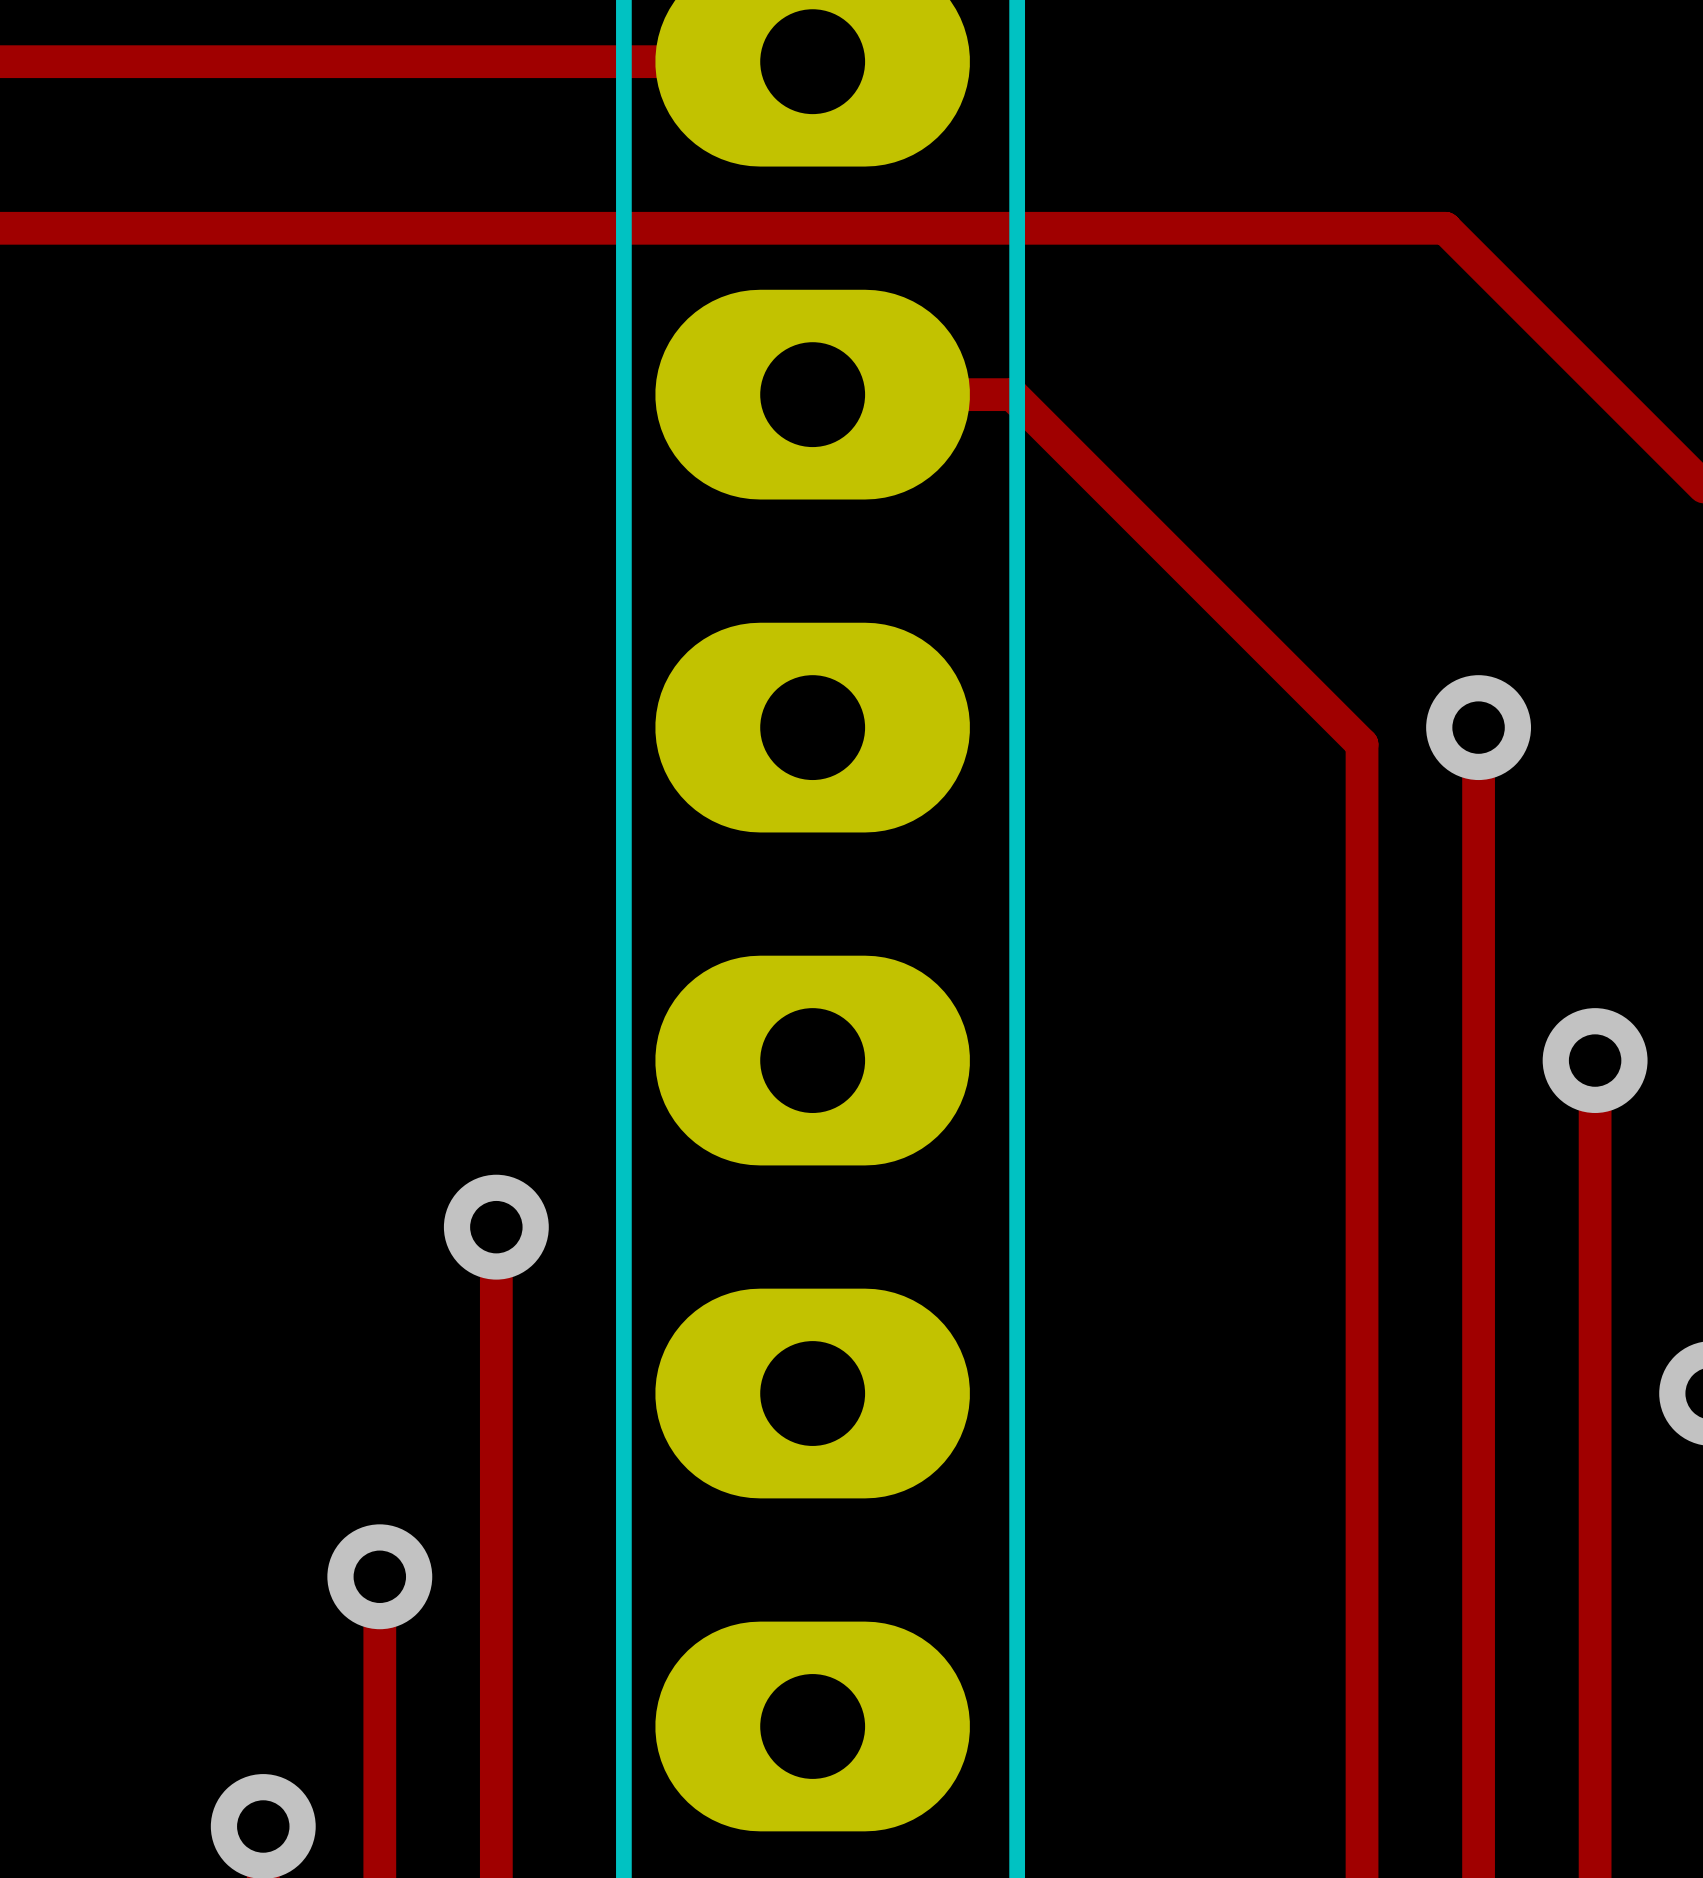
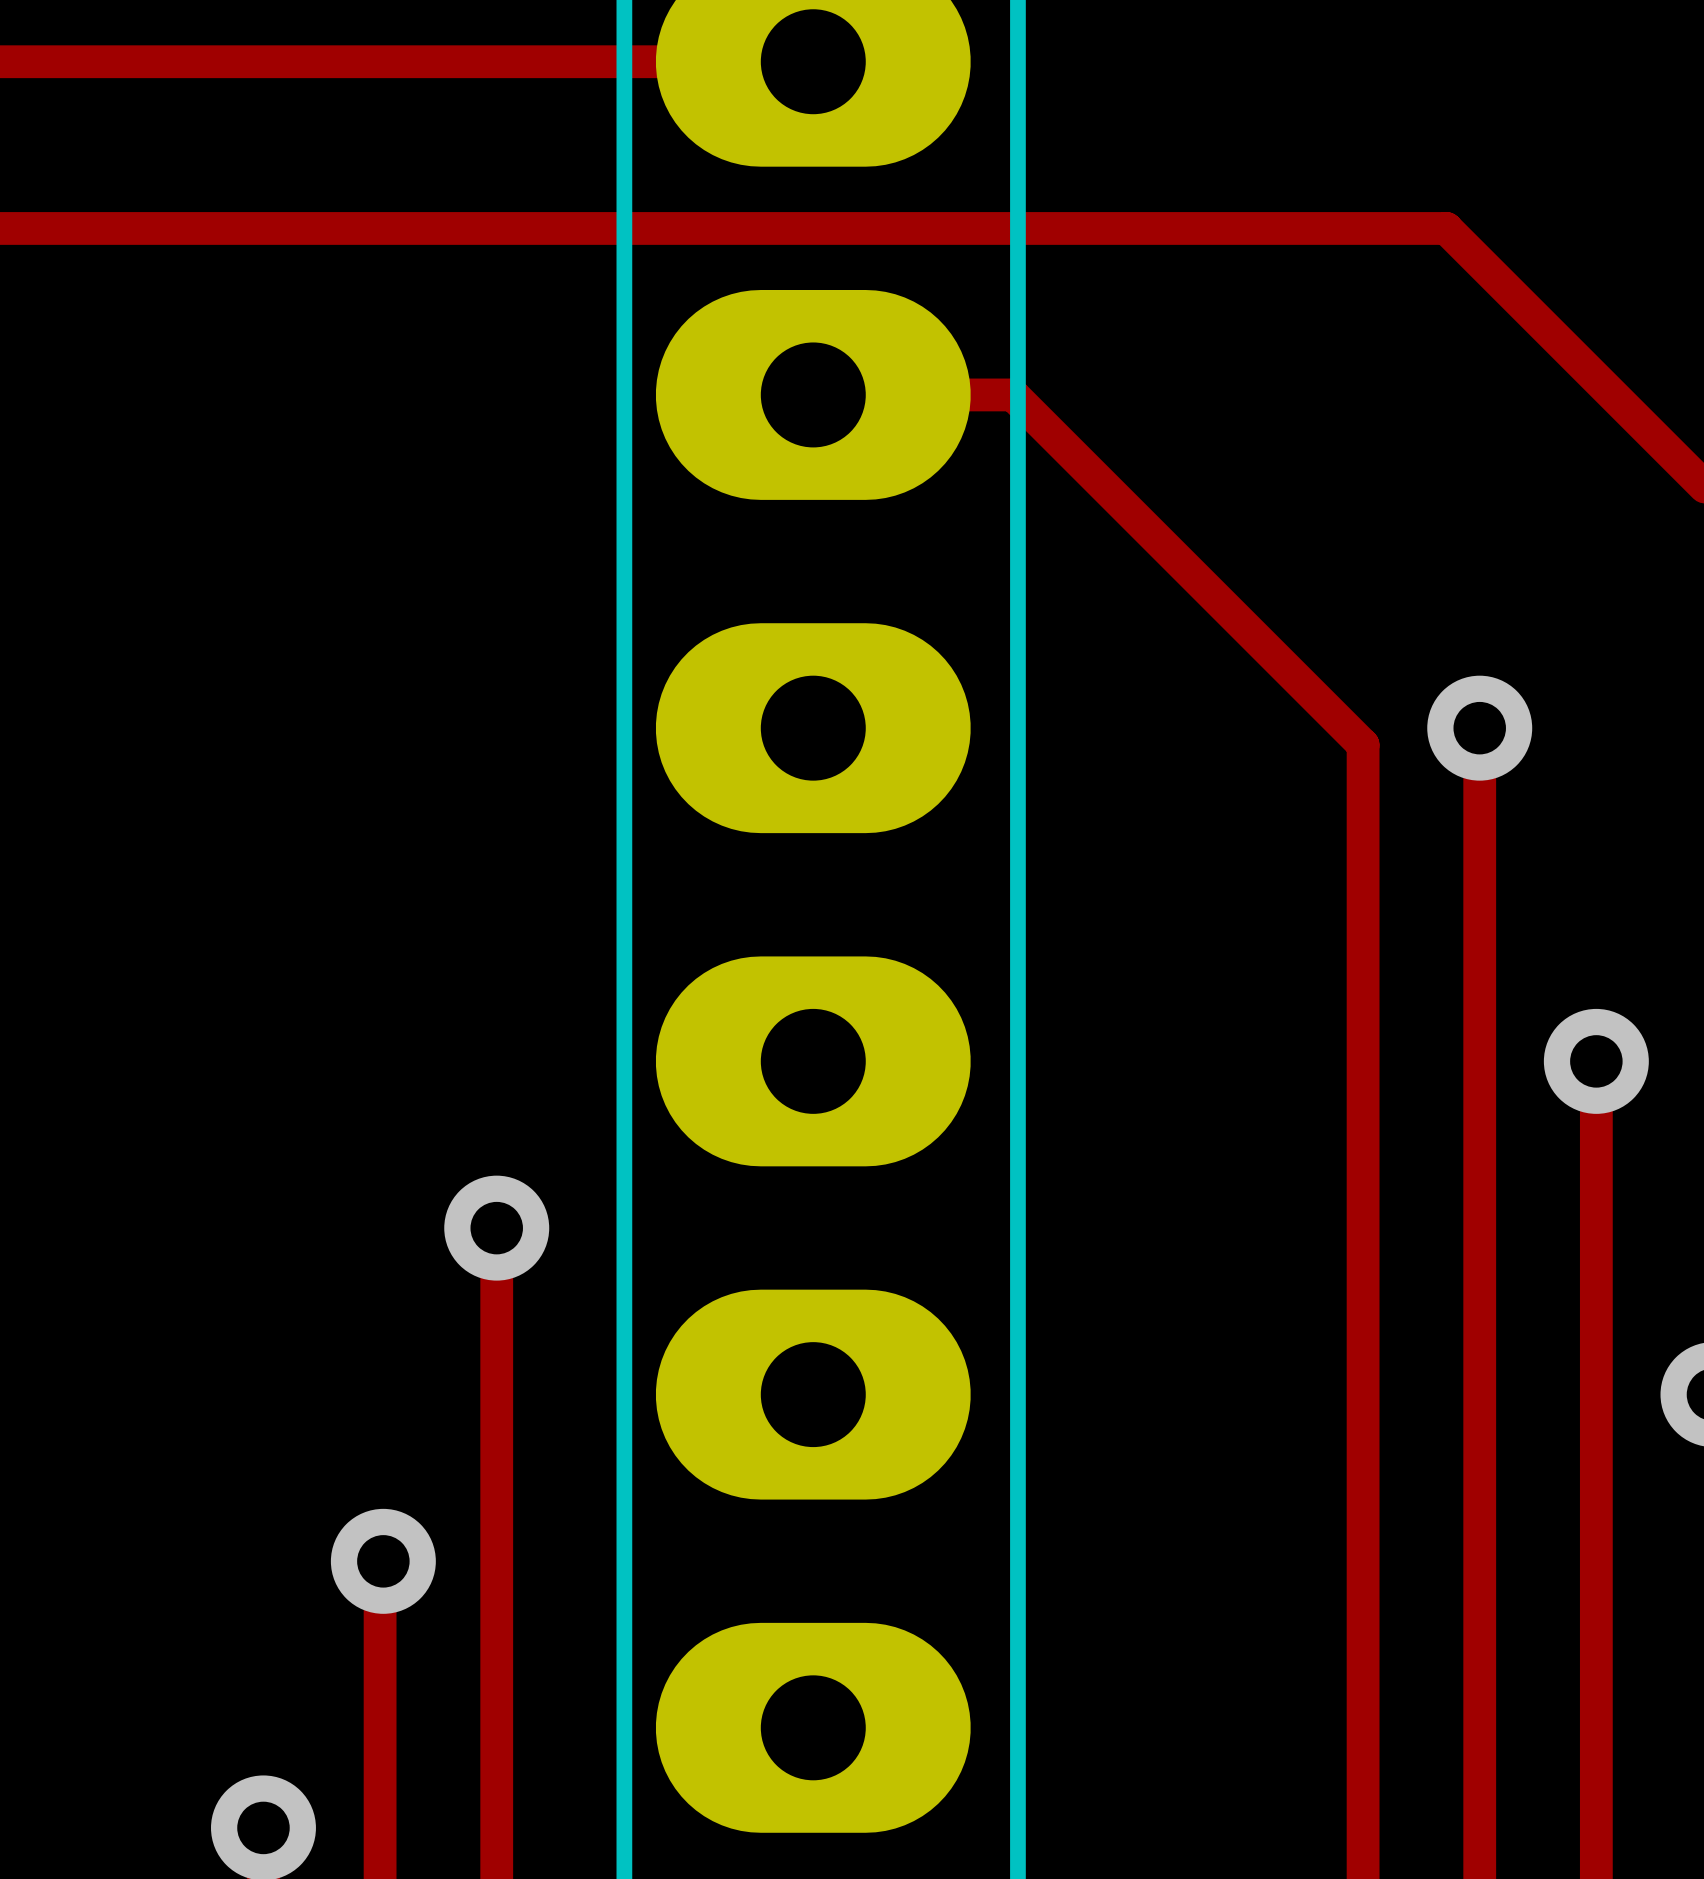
via position: (379, 1576) -> (383, 1561)

